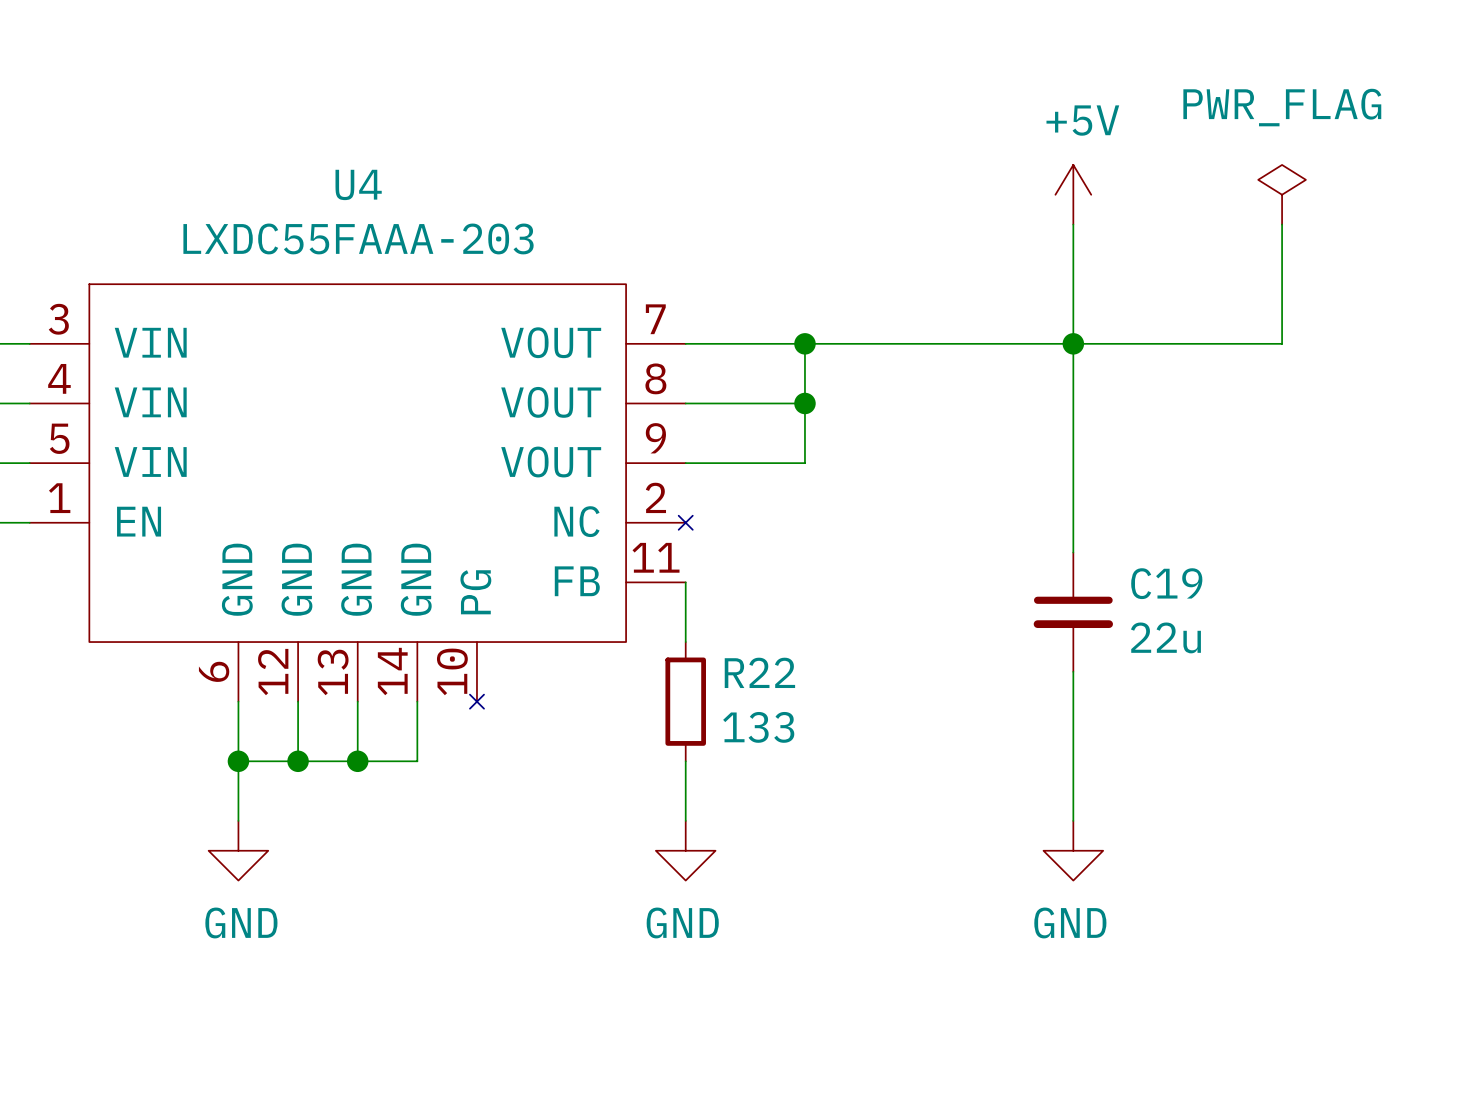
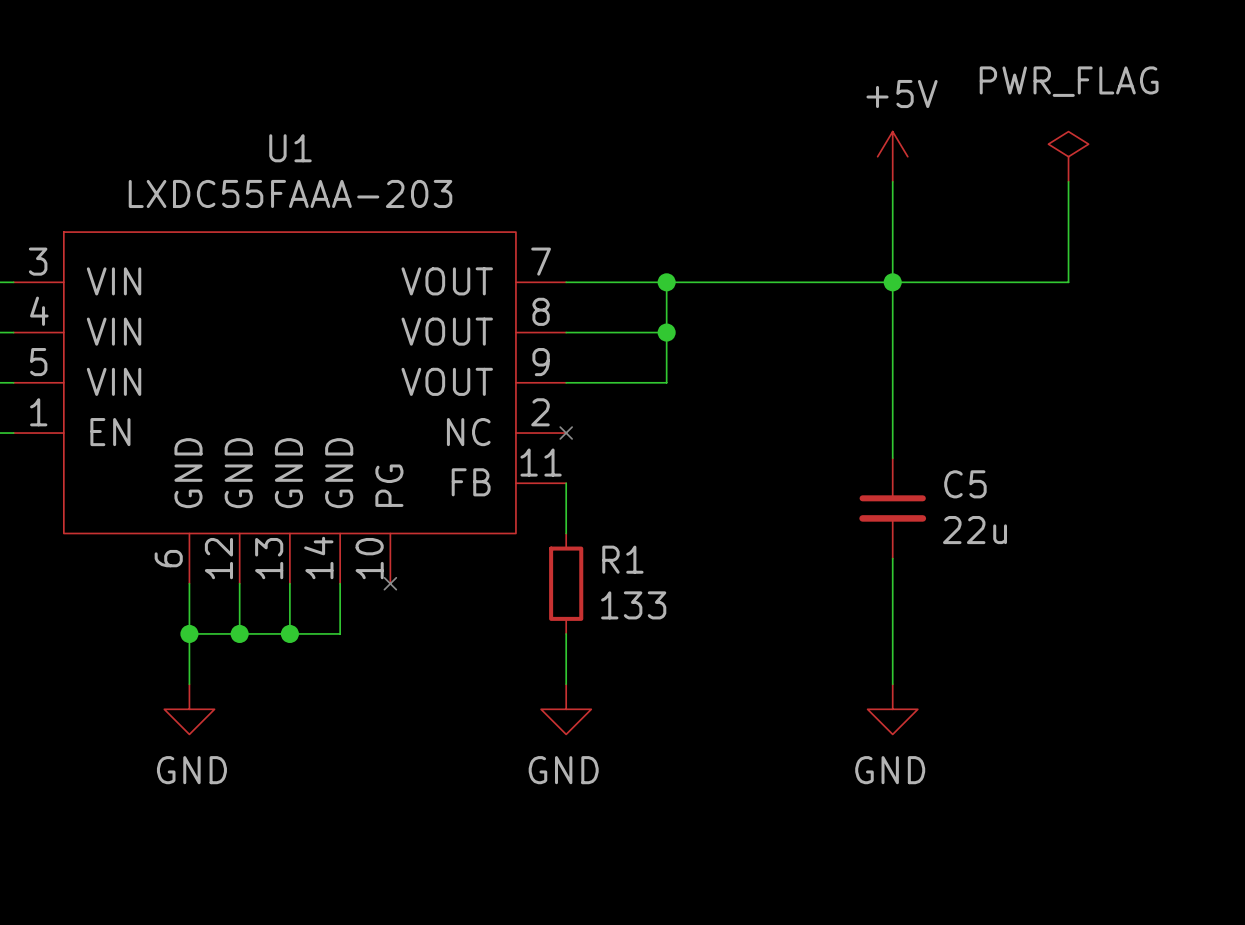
U4 name: U4 (358, 184) -> U1 (290, 148)
C19 name: C19 (1166, 583) -> C5 (965, 484)
R22 name: R22 (759, 672) -> R1 (622, 559)

